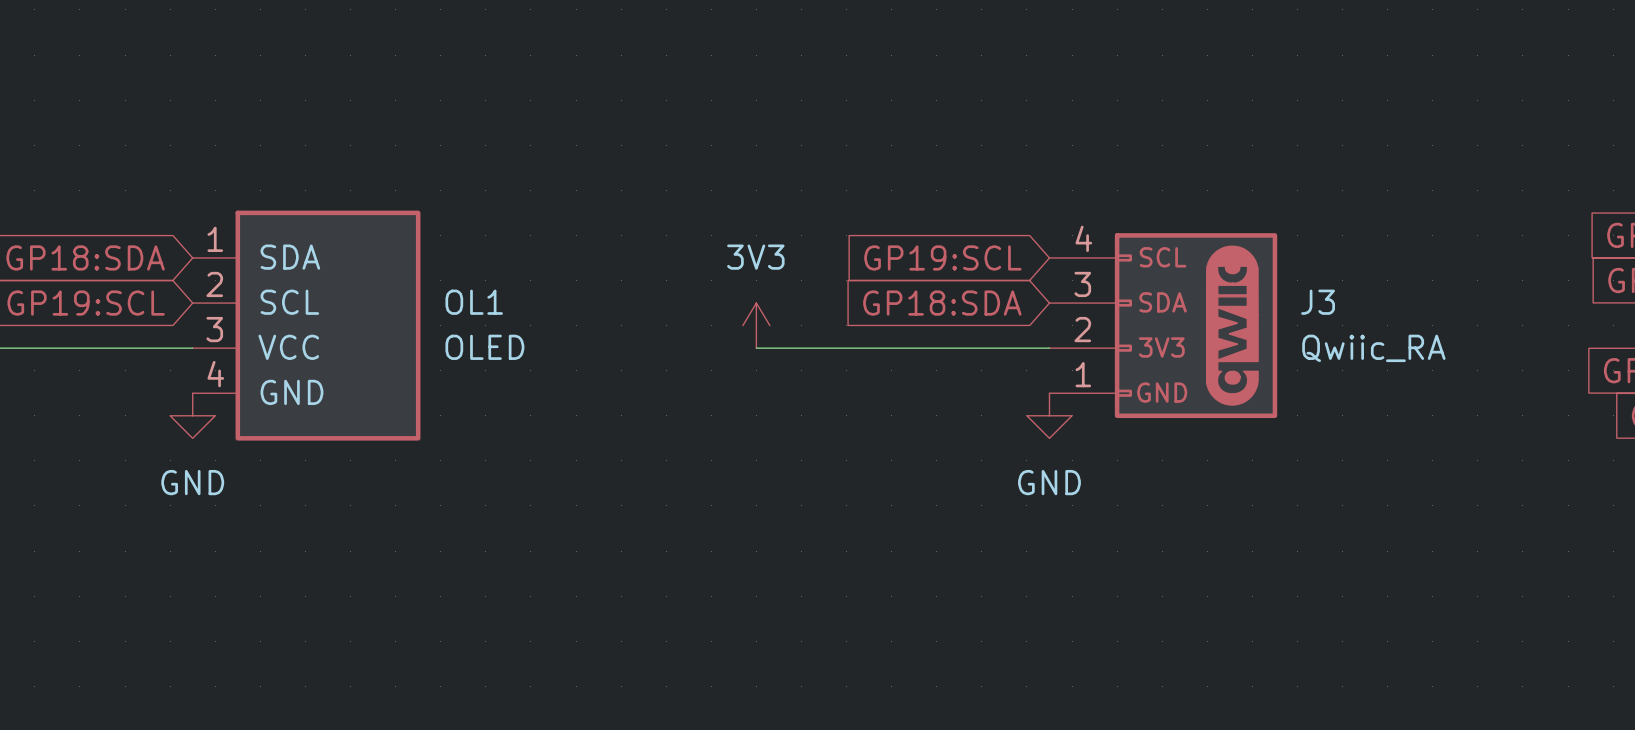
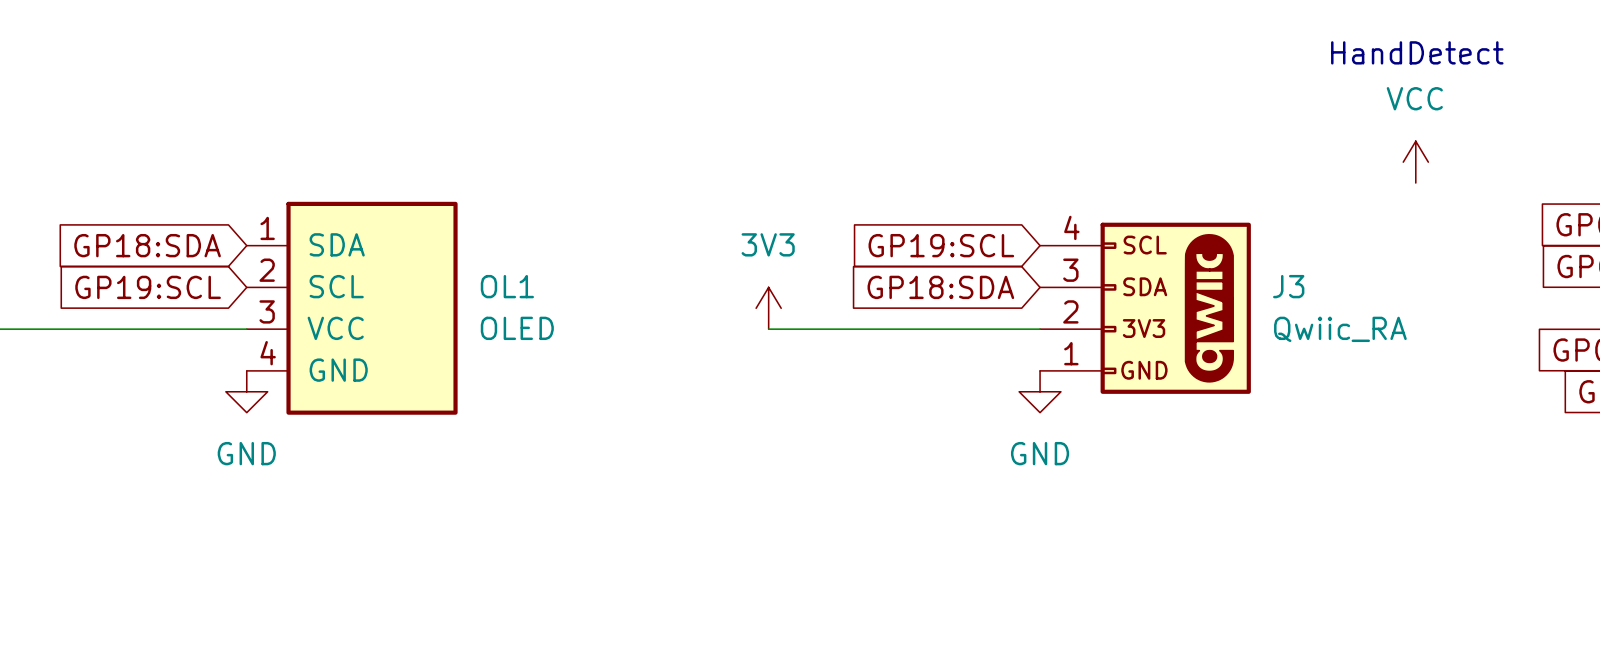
text: none -> HandDetect (1417, 52)
power symbol: none -> VCC (1415, 162)

